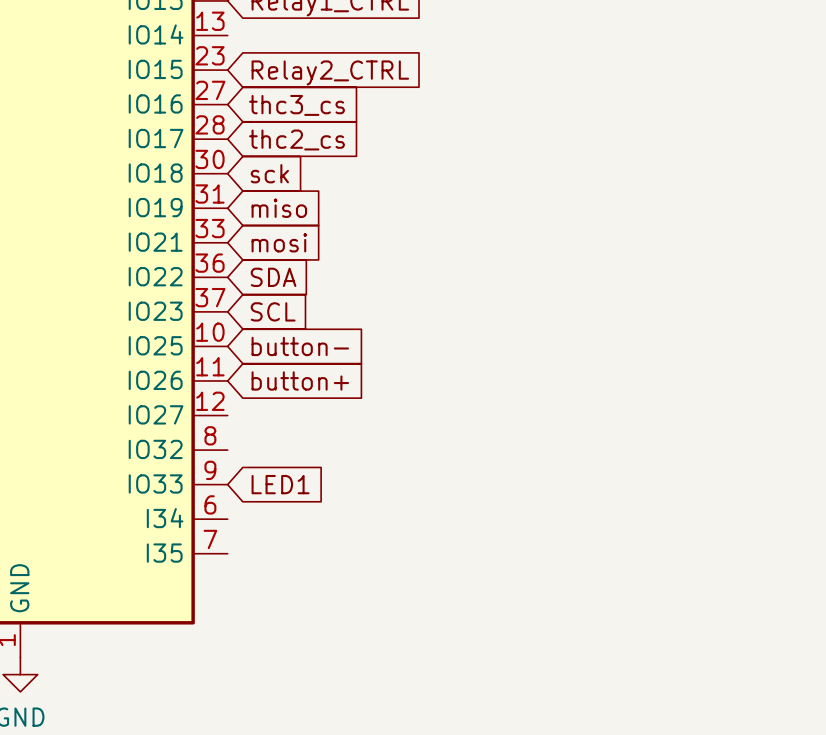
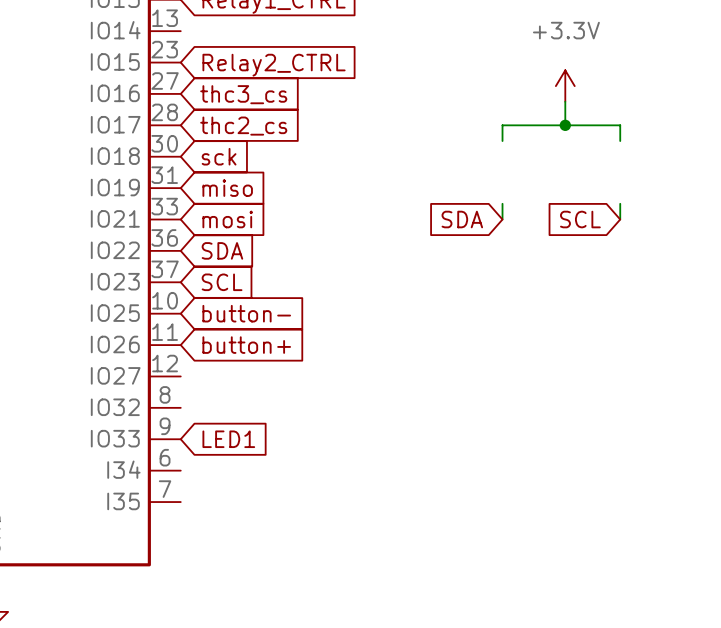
power symbol: none -> +3.3V (565, 86)
wire: none -> (565, 101) (565, 125)
junction: none -> (565, 125)
wire: none -> (502, 141) (502, 125) (620, 125) (620, 141)
wire: none -> (502, 203) (502, 219)
wire: none -> (620, 203) (620, 219)
global label: none -> SDA (462, 219)
global label: none -> SCL (580, 219)

